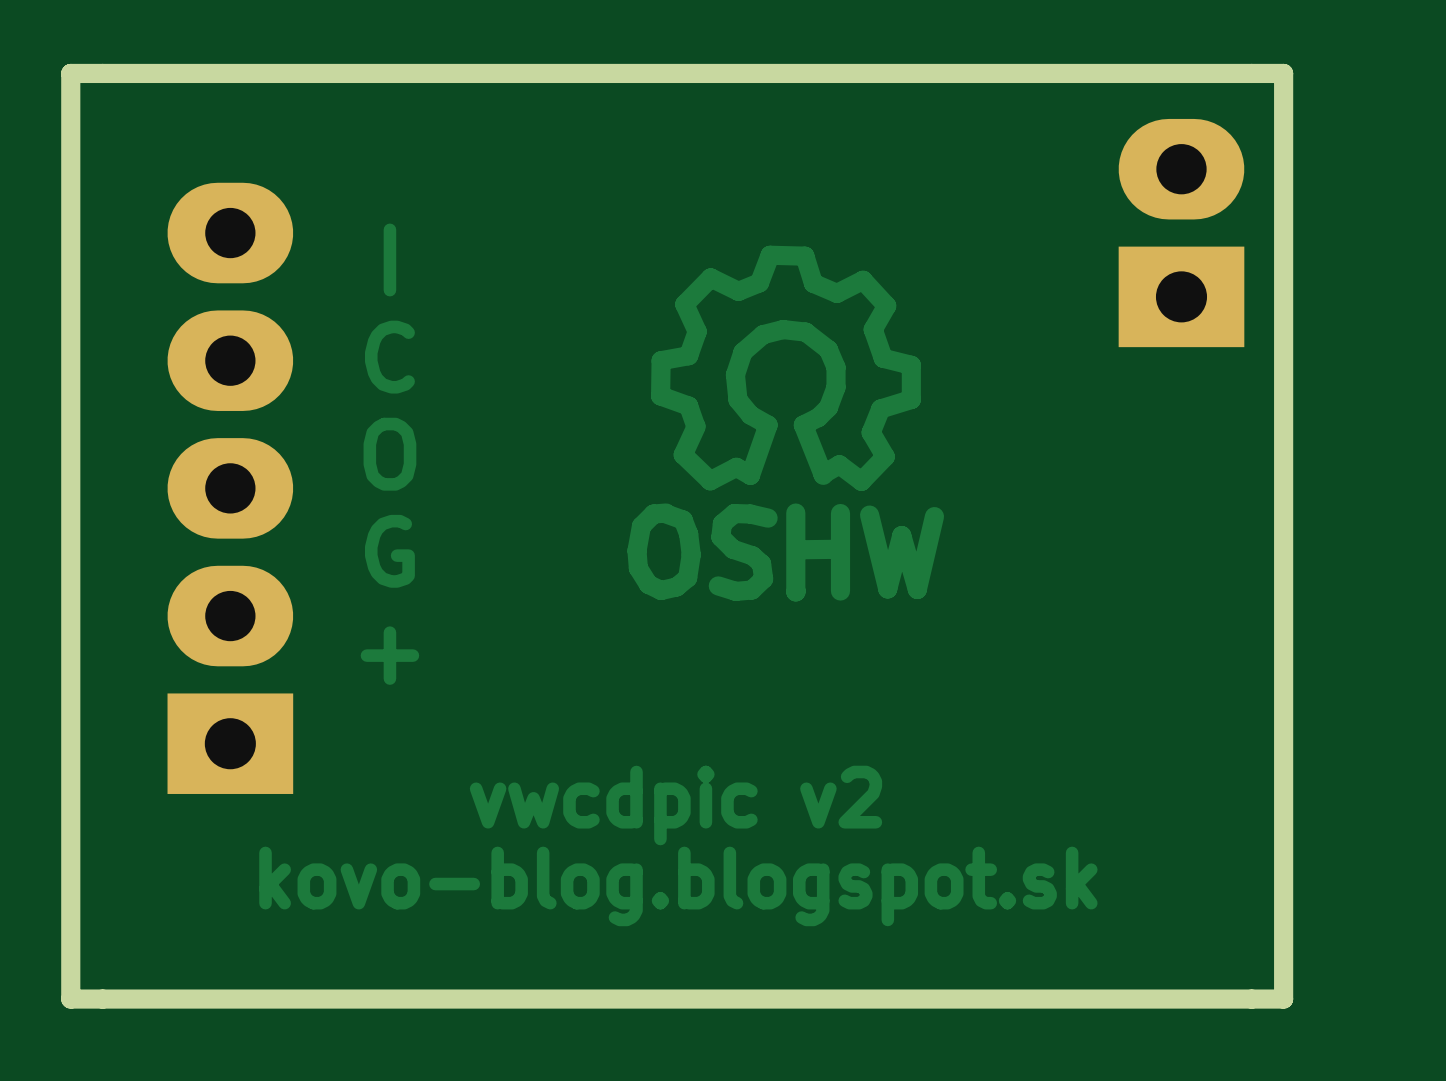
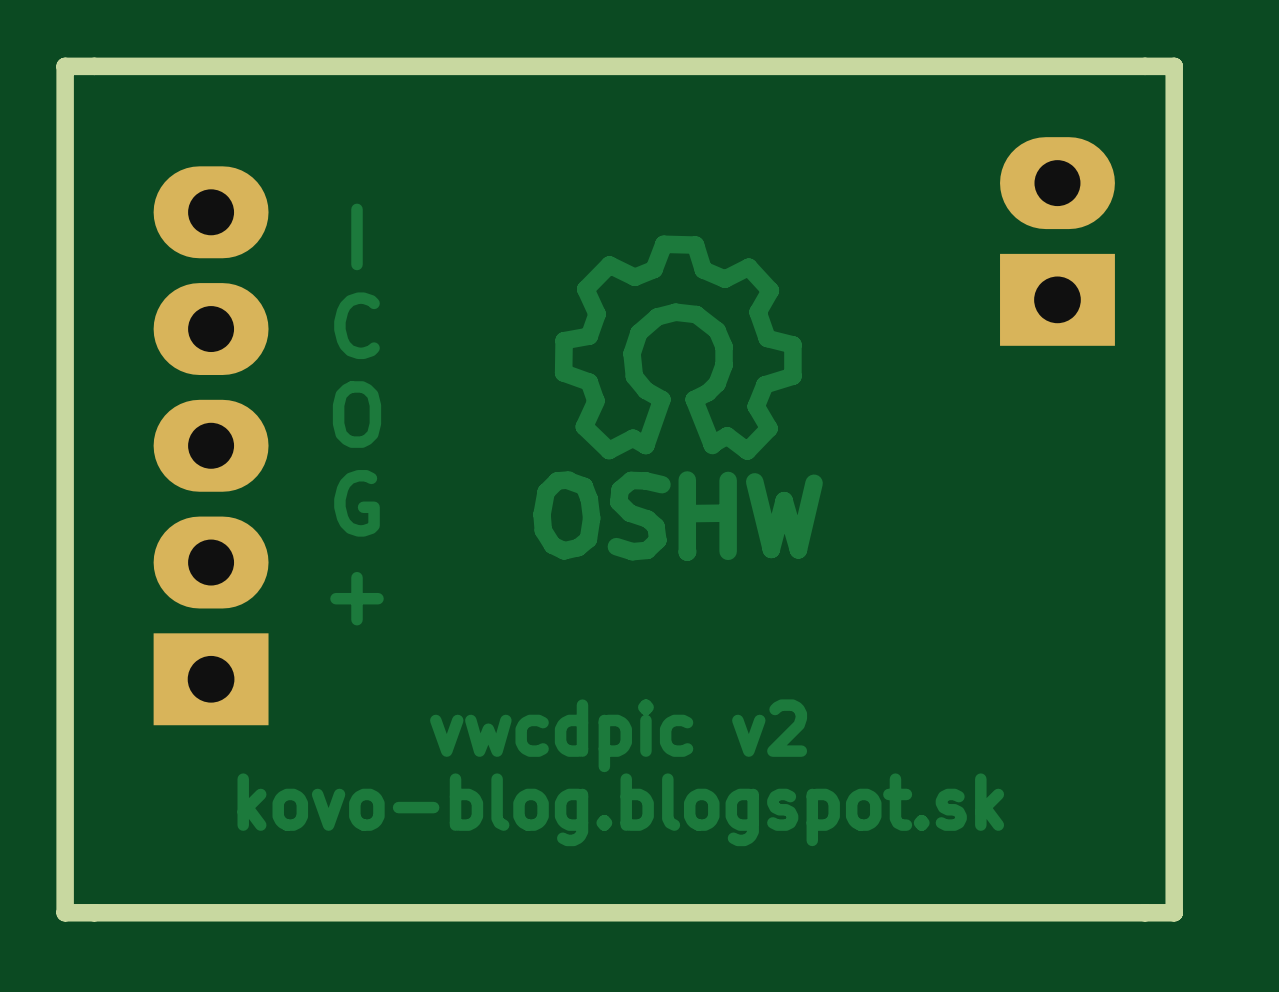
part position: (1181, 233) -> (1057, 241)
drawing position: (785, 423) -> (678, 398)

